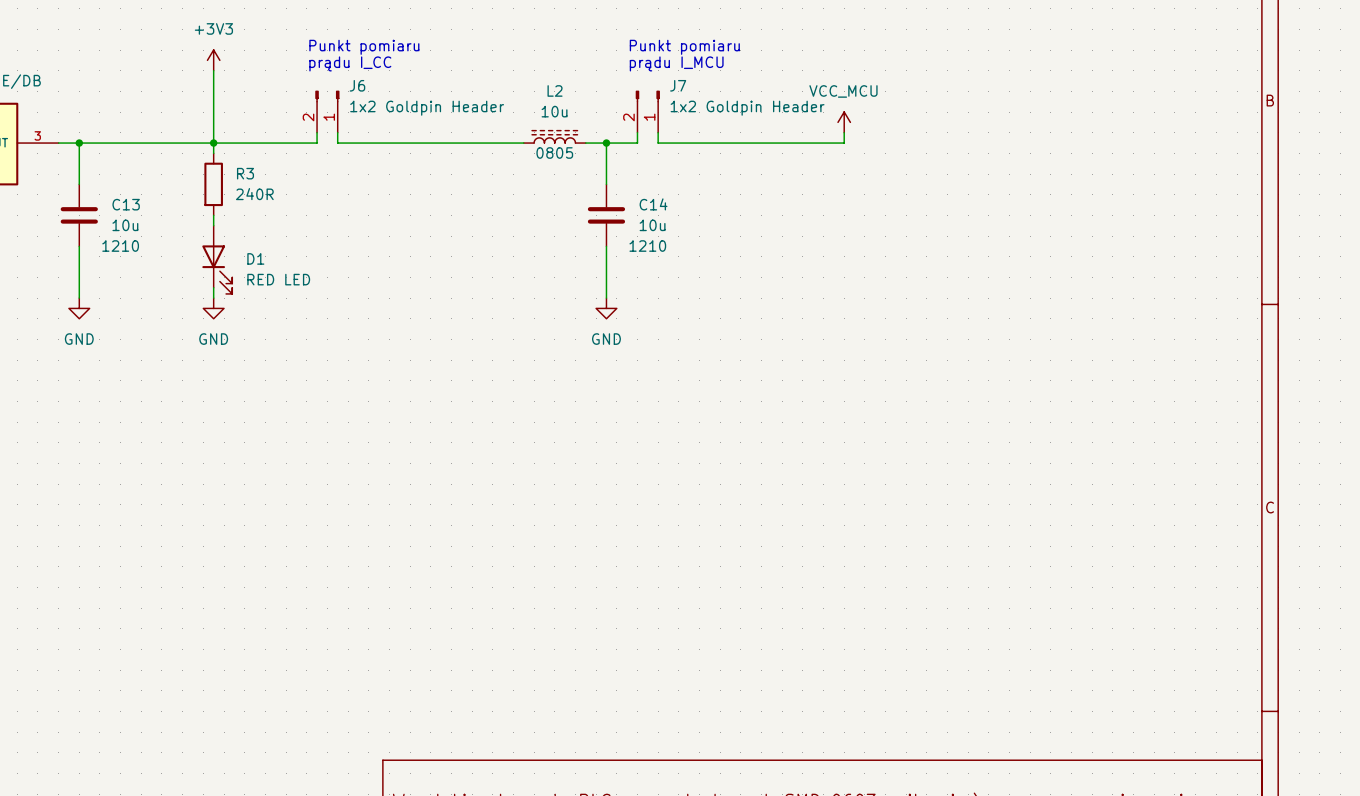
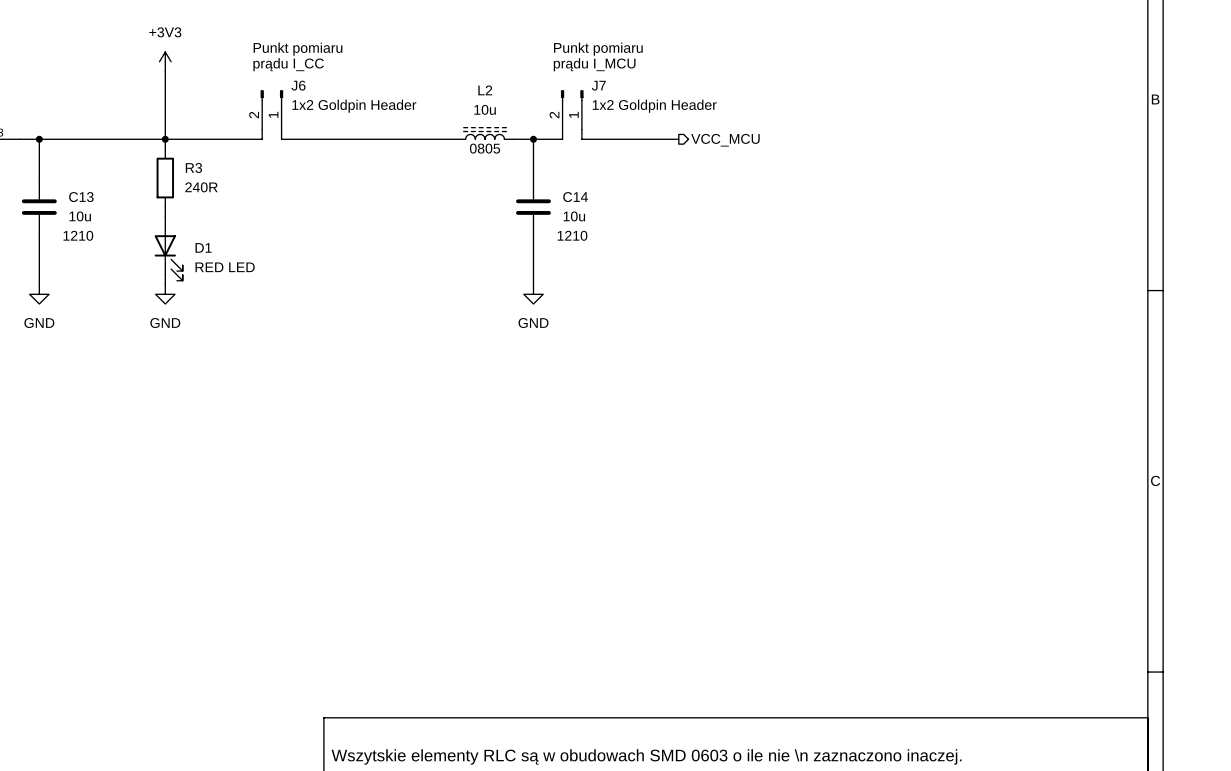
power symbol: VCC_MCU (844, 122) -> none
wire: (844, 132) (844, 143) (761, 143) -> none
hierarchical label: none -> VCC_MCU (725, 140)

